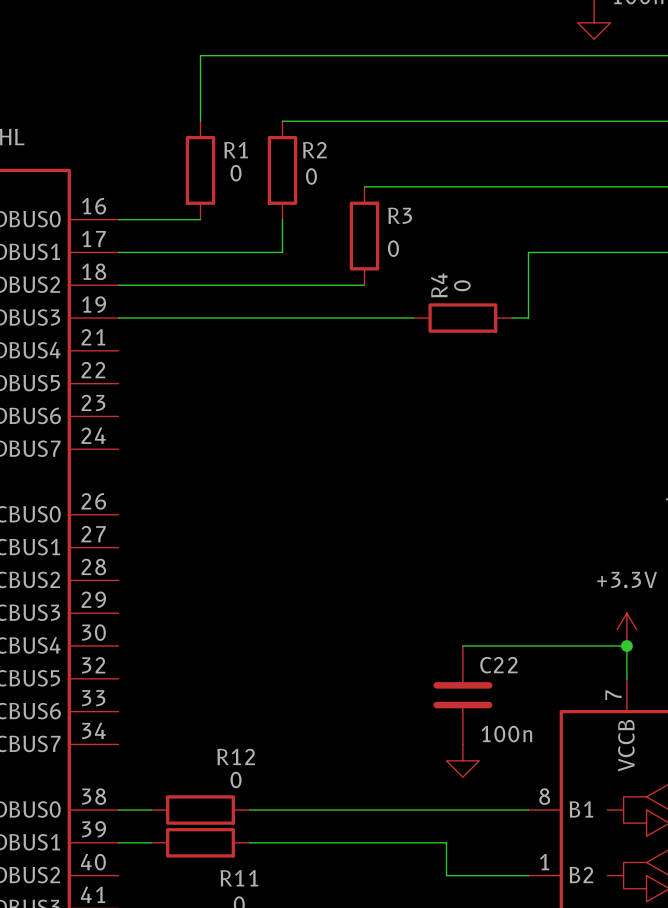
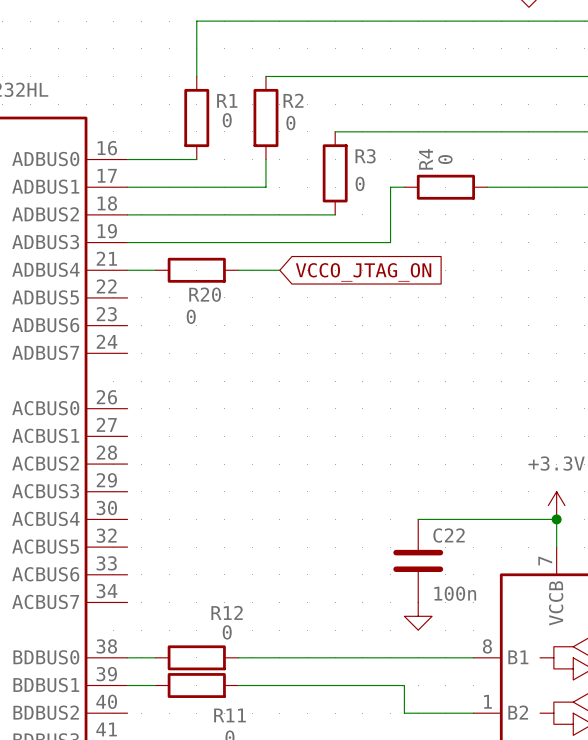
wire: (544, 252) (528, 252) (528, 318) (512, 318) -> (404, 187) (390, 187) (390, 242) (376, 242)
R4 position: (462, 318) -> (445, 187)
wire: none -> (127, 270) (155, 270)
R20: none -> 0 (196, 270)
wire: none -> (238, 270) (279, 270)
global label: none -> VCCO_JTAG_ON (363, 272)

